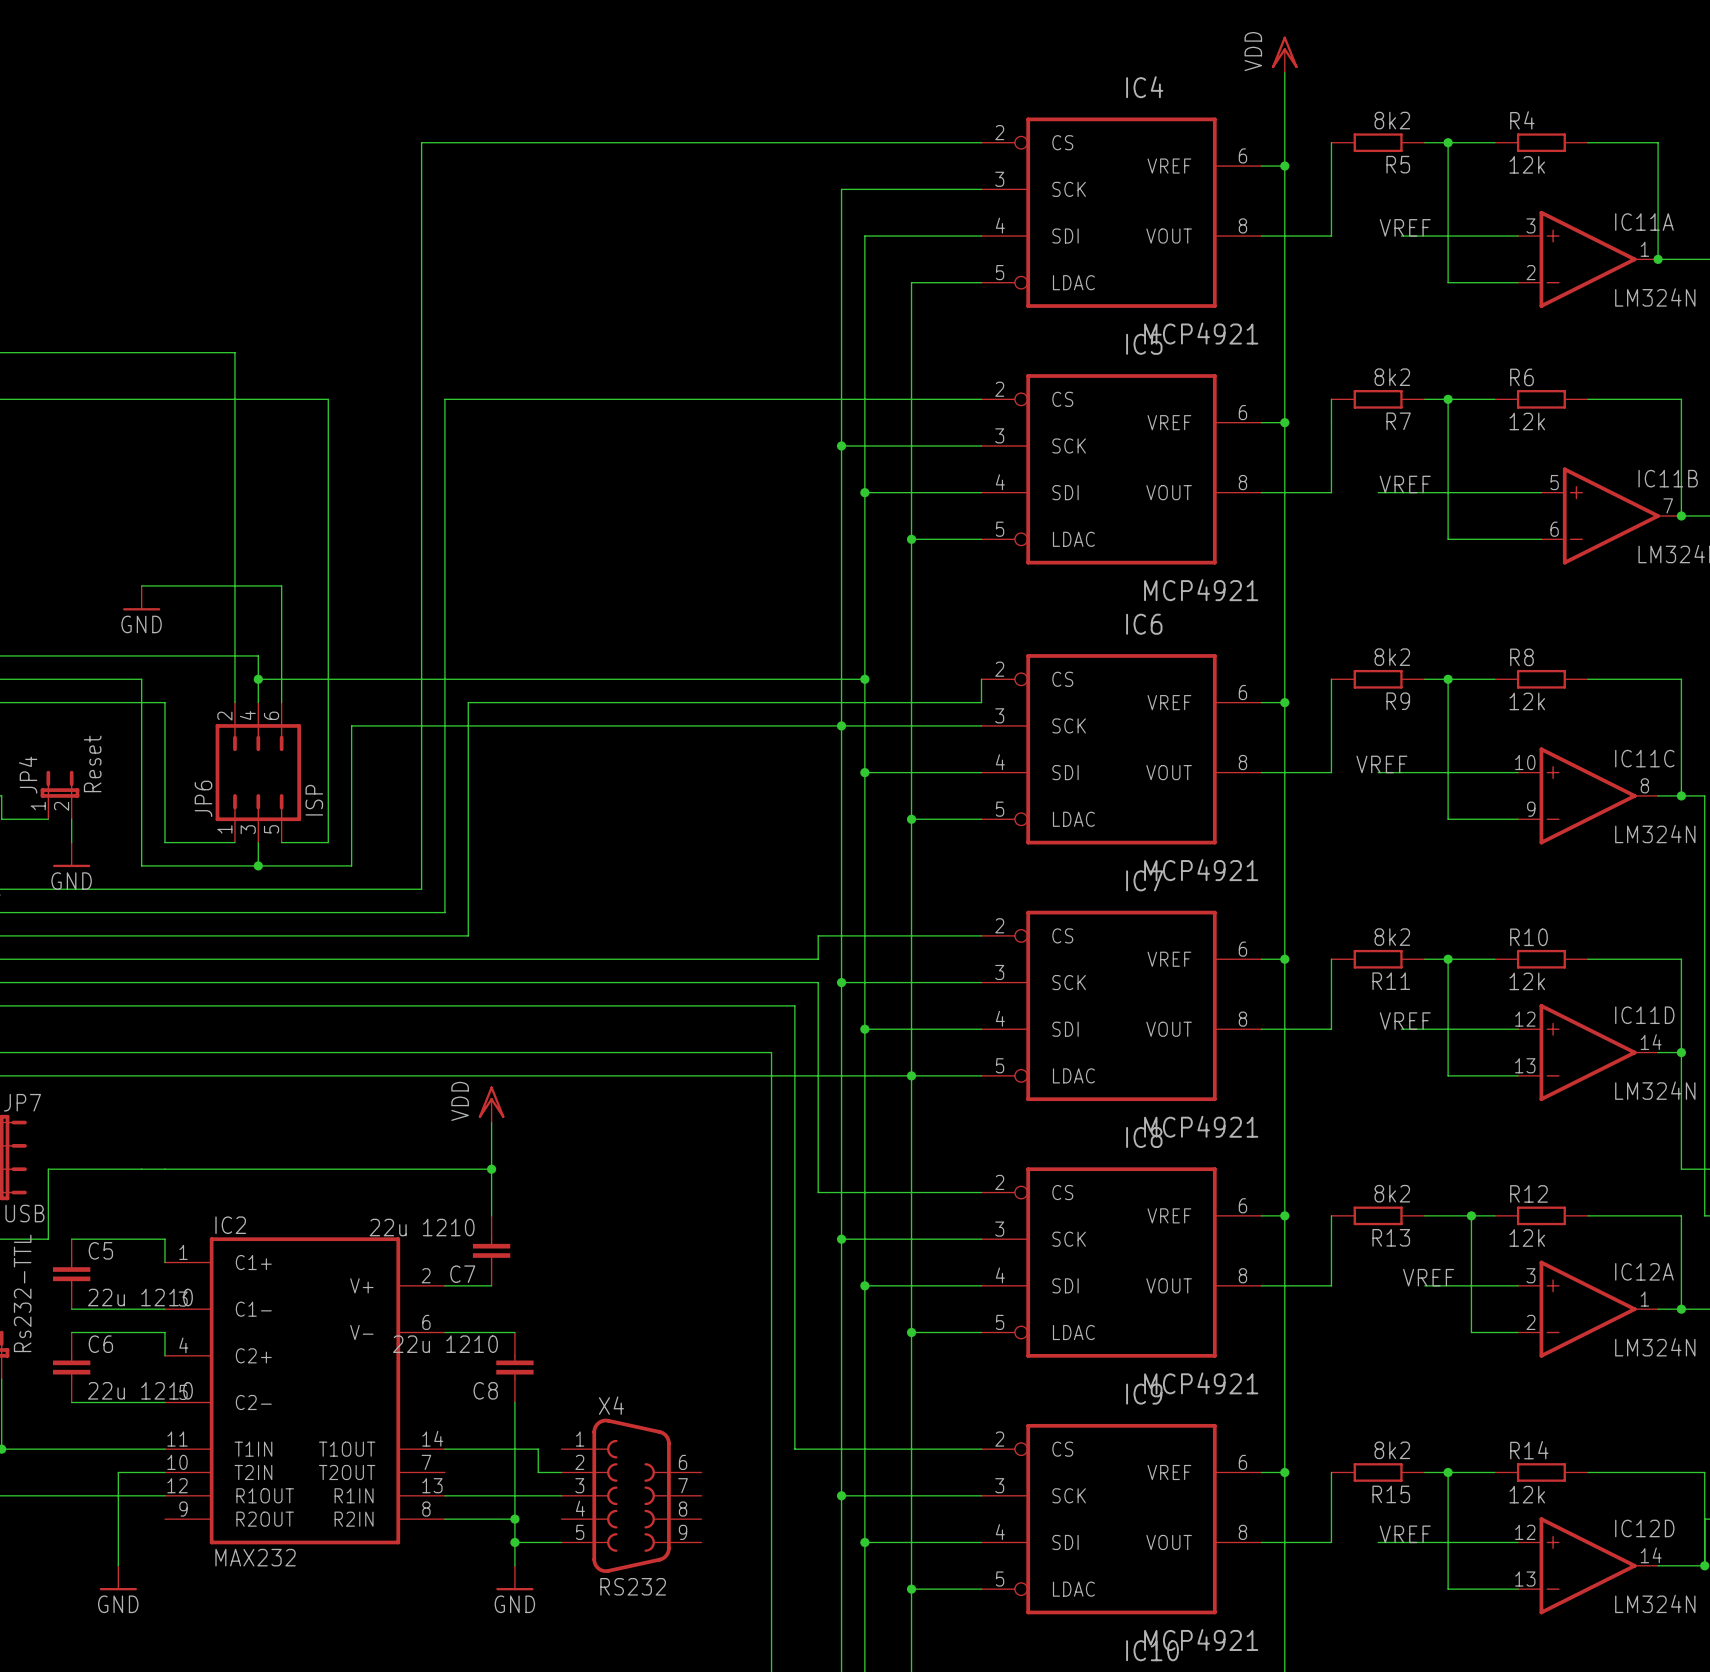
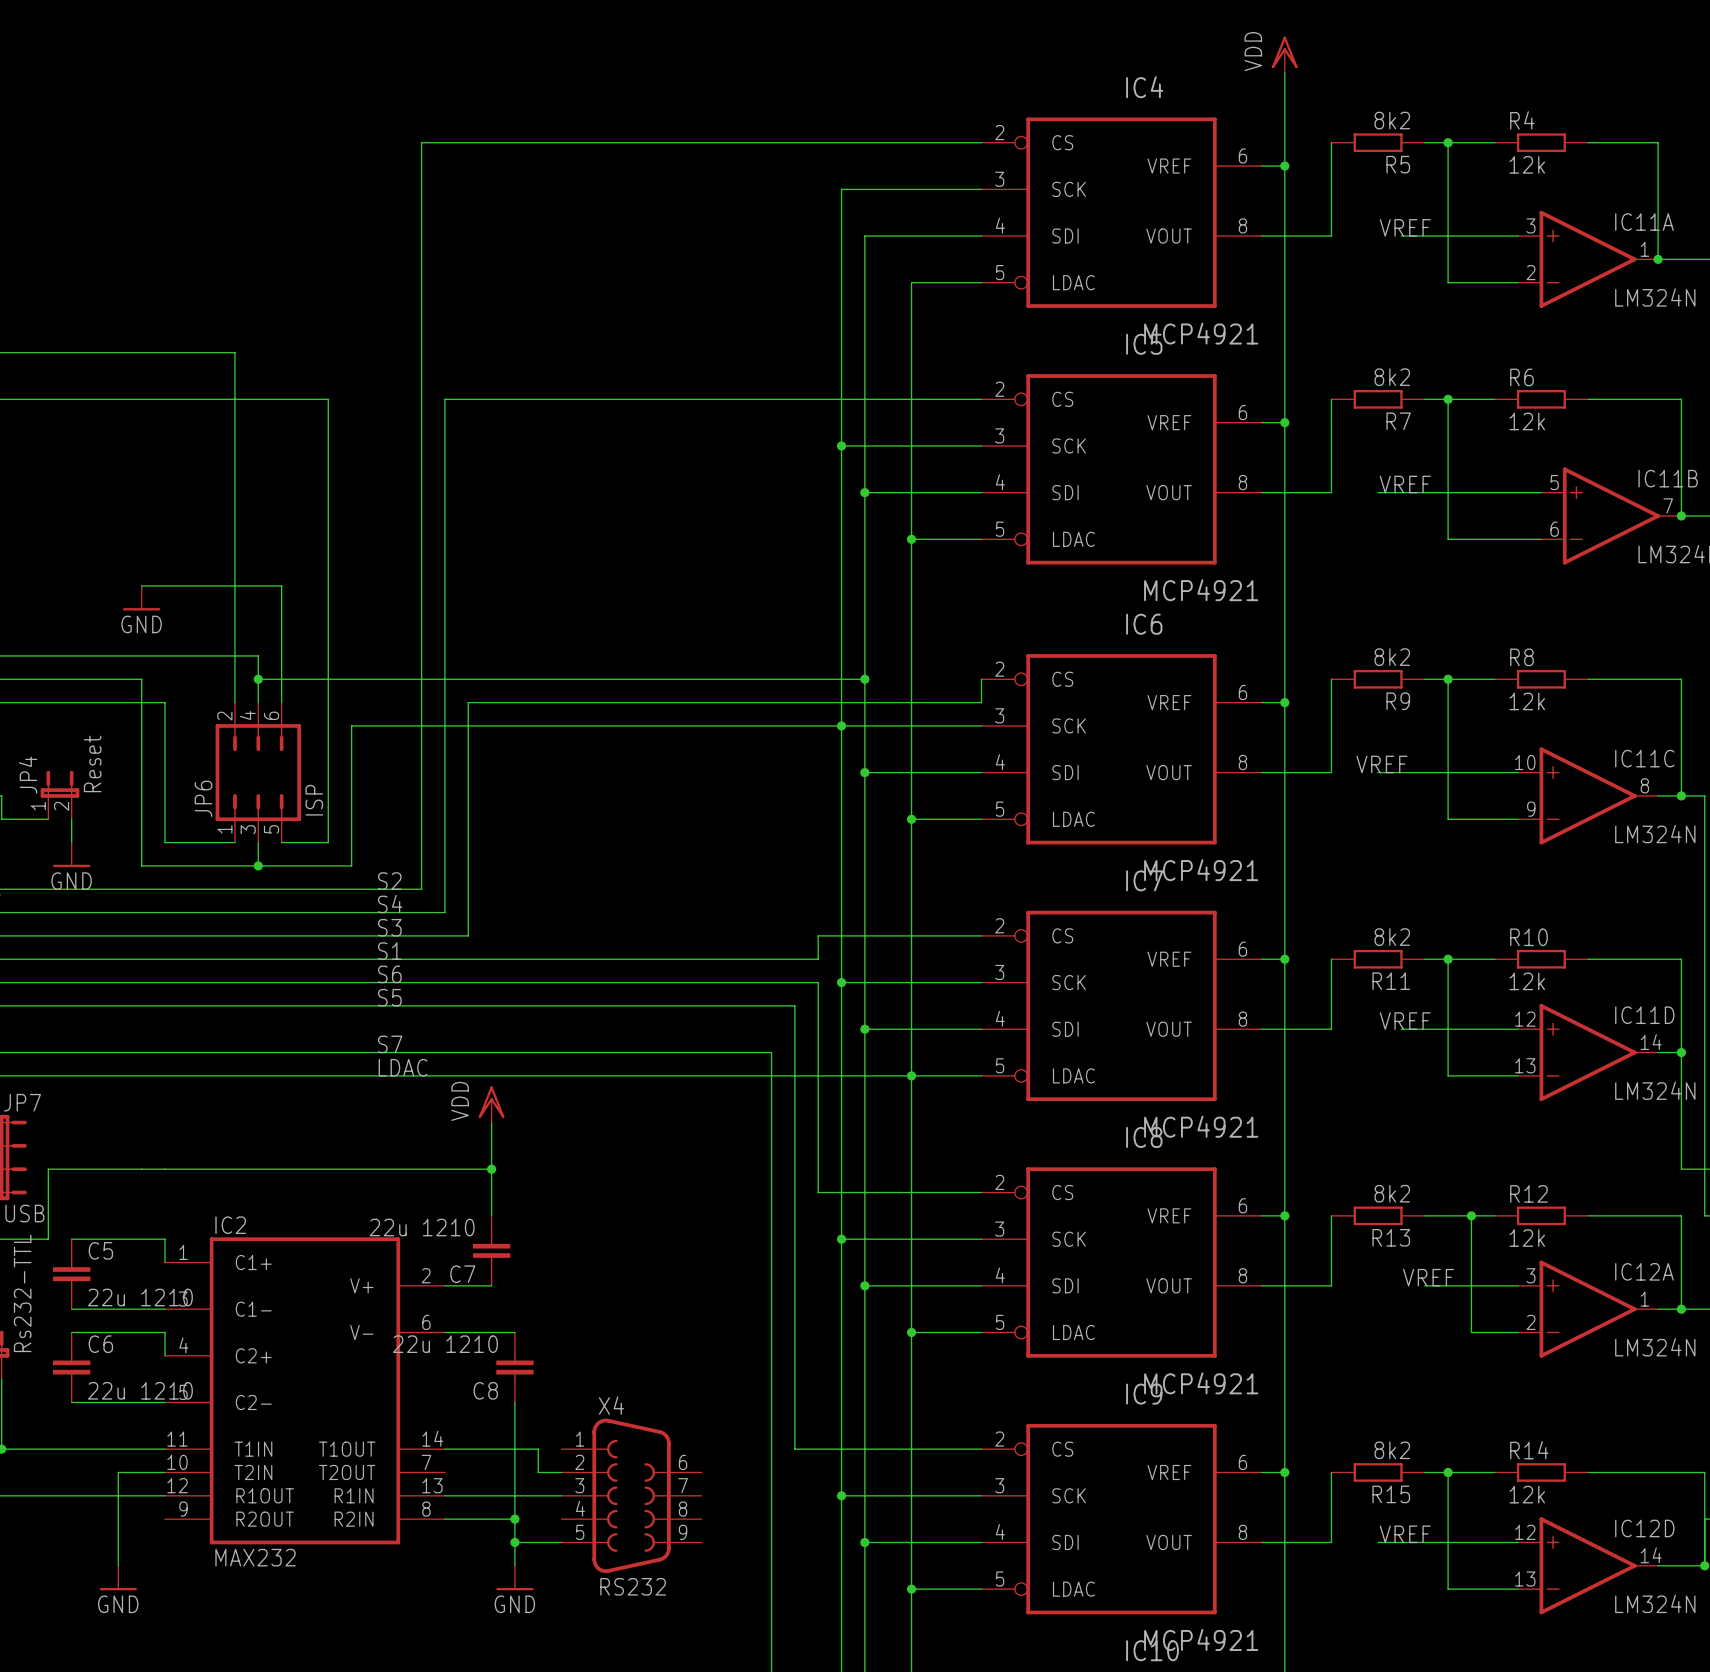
label: none -> S2 (389, 881)
label: none -> S4 (390, 904)
label: none -> S3 (389, 927)
label: none -> S1 (389, 951)
label: none -> S6 (389, 974)
label: none -> S5 (389, 997)
label: none -> S7 (390, 1044)
label: none -> LDAC (403, 1067)

